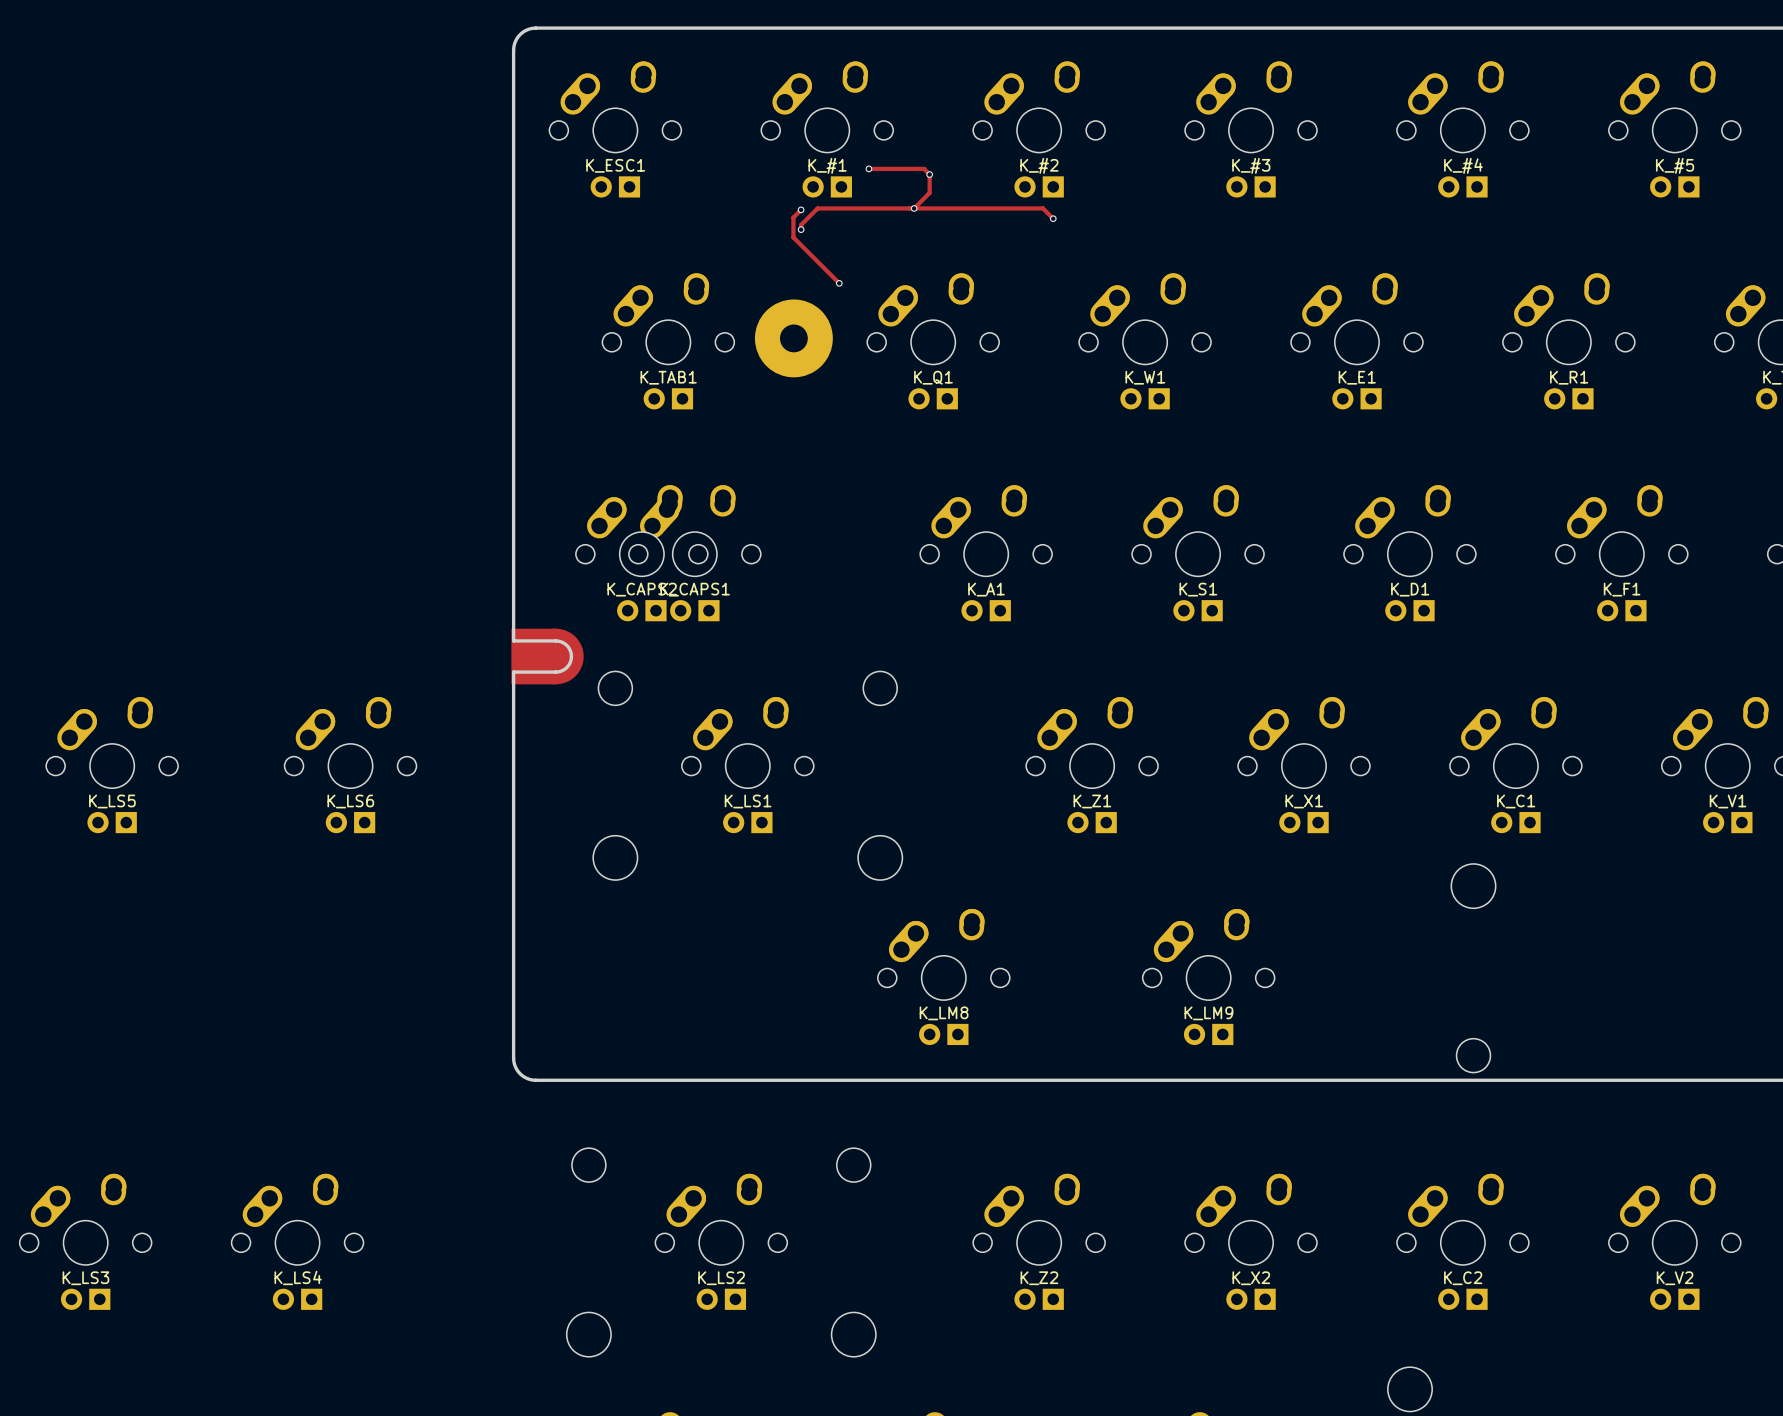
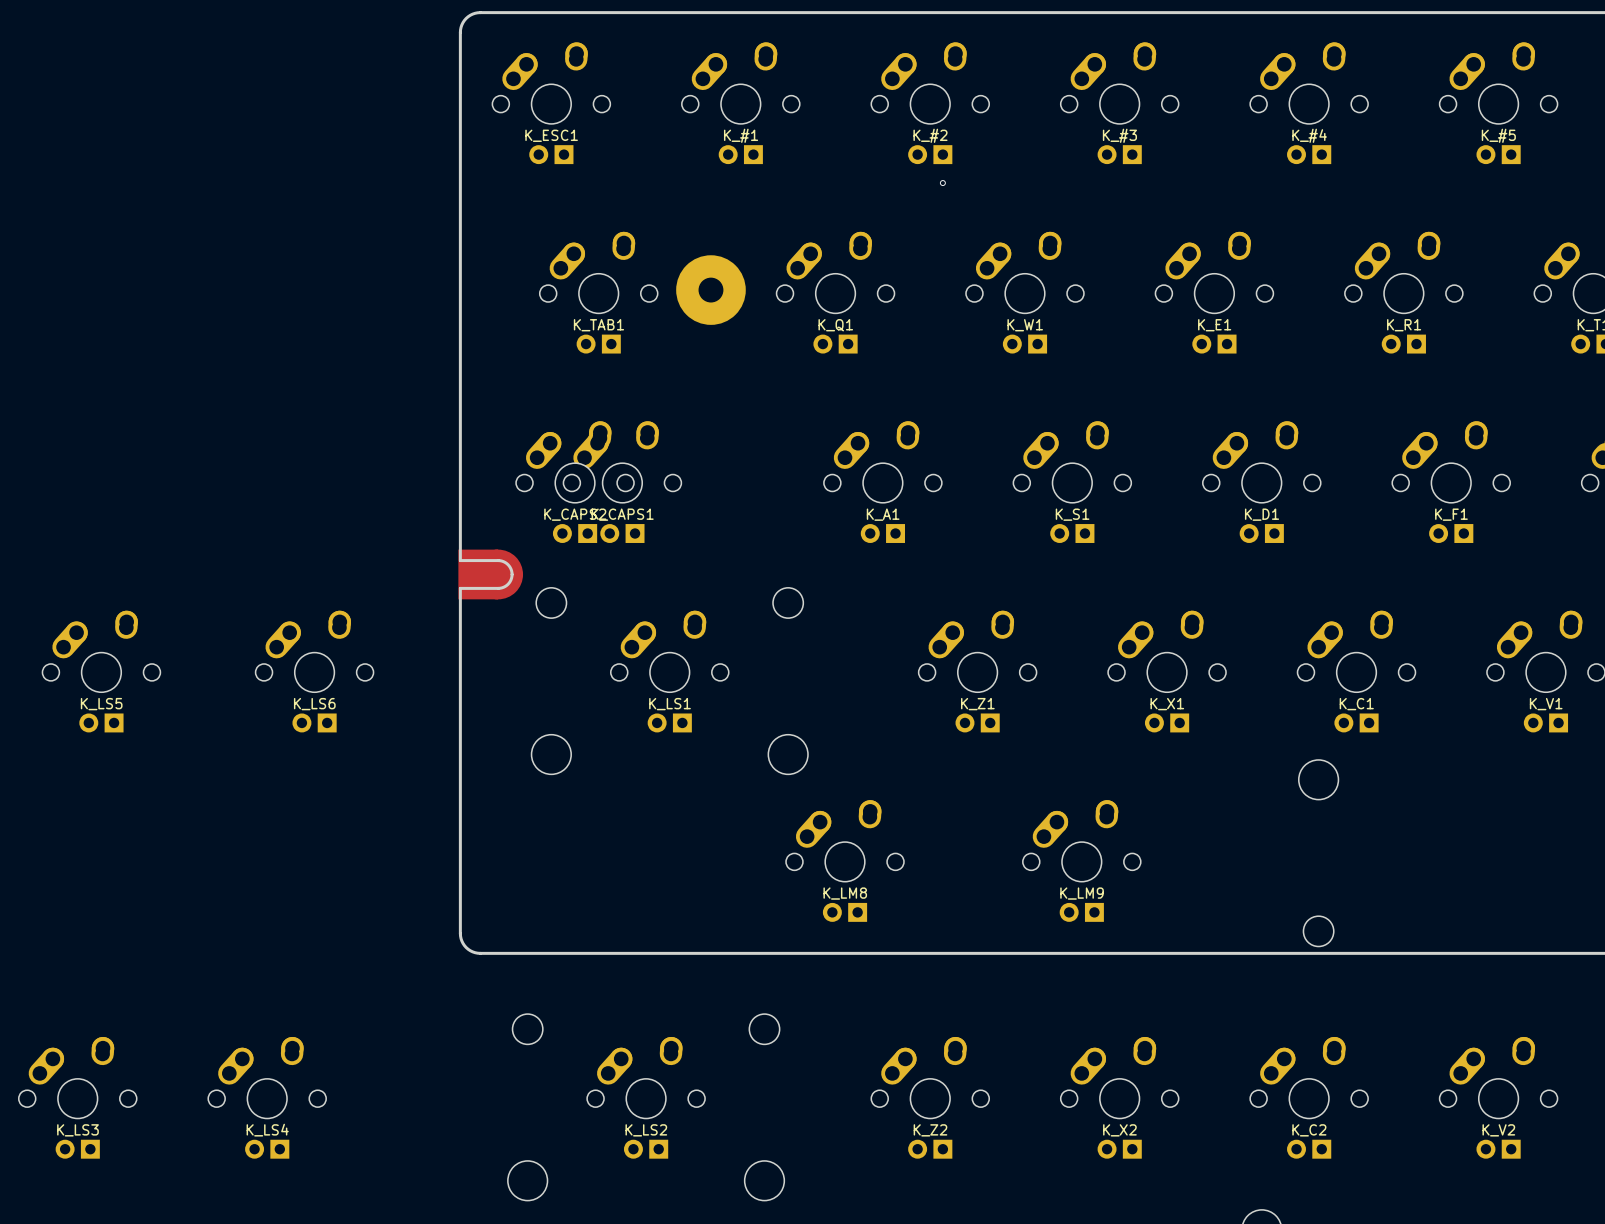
track: (868, 168) (924, 168) (929, 174) (929, 192) (914, 208) -> none
via: (868, 168) -> none
via: (929, 174) -> none
via: (914, 208) -> none
track: (801, 209) (793, 217) (793, 237) (839, 283) -> none
via: (801, 209) -> none
track: (1053, 218) (1043, 208) (817, 208) (801, 224) (801, 229) -> none
via: (801, 229) -> none
via: (839, 283) -> none

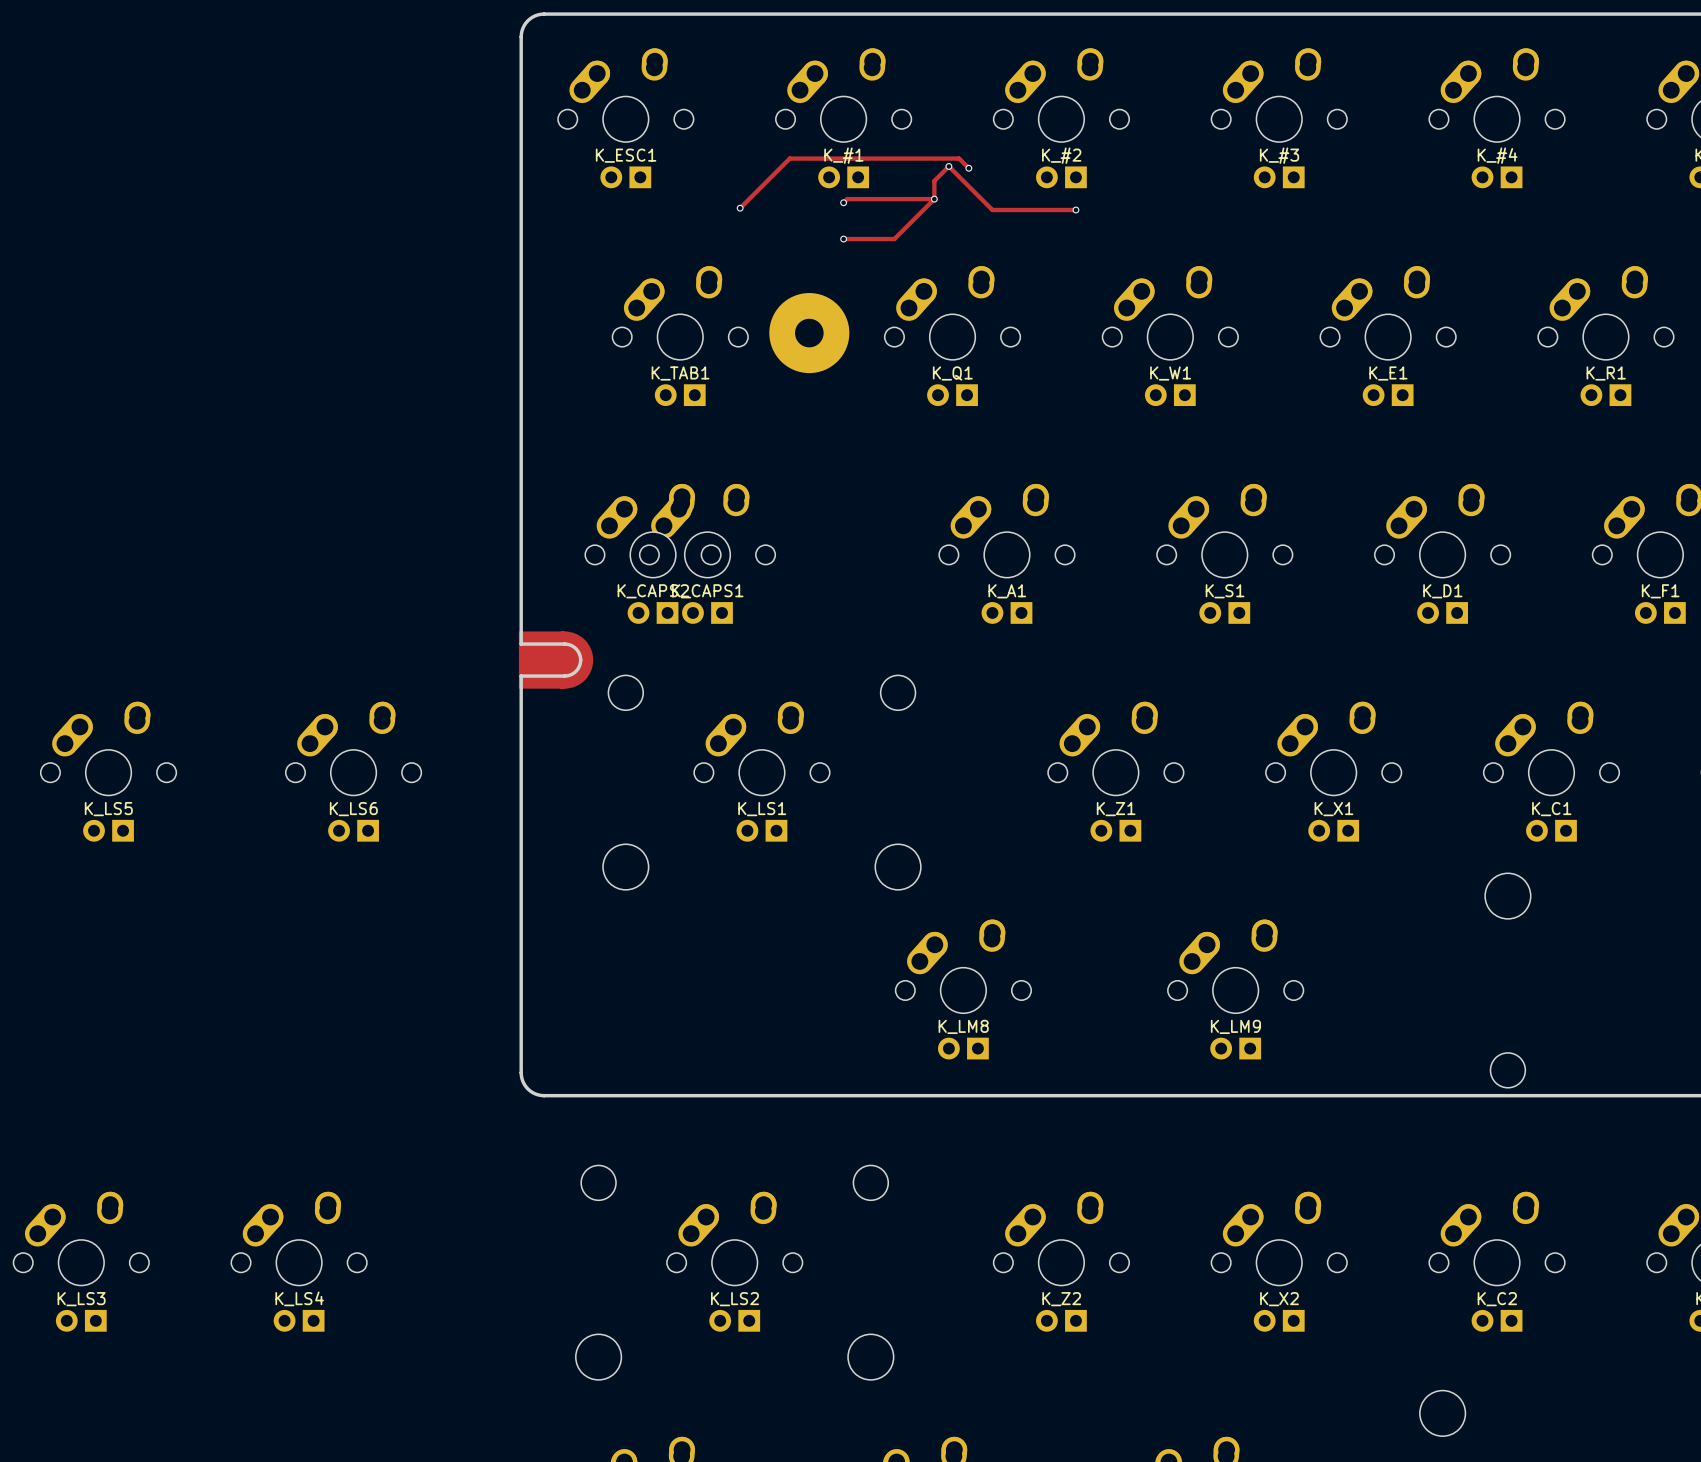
via: none -> (948, 166)
track: none -> (968, 168) (959, 158) (789, 158) (740, 208)
via: none -> (968, 168)
track: none -> (934, 199) (934, 180) (948, 166) (992, 210) (1075, 210)
track: none -> (934, 199) (894, 239) (843, 239)
track: none -> (934, 199) (847, 199) (843, 202)
via: none -> (934, 199)
via: none -> (843, 202)
via: none -> (740, 208)
via: none -> (843, 239)

